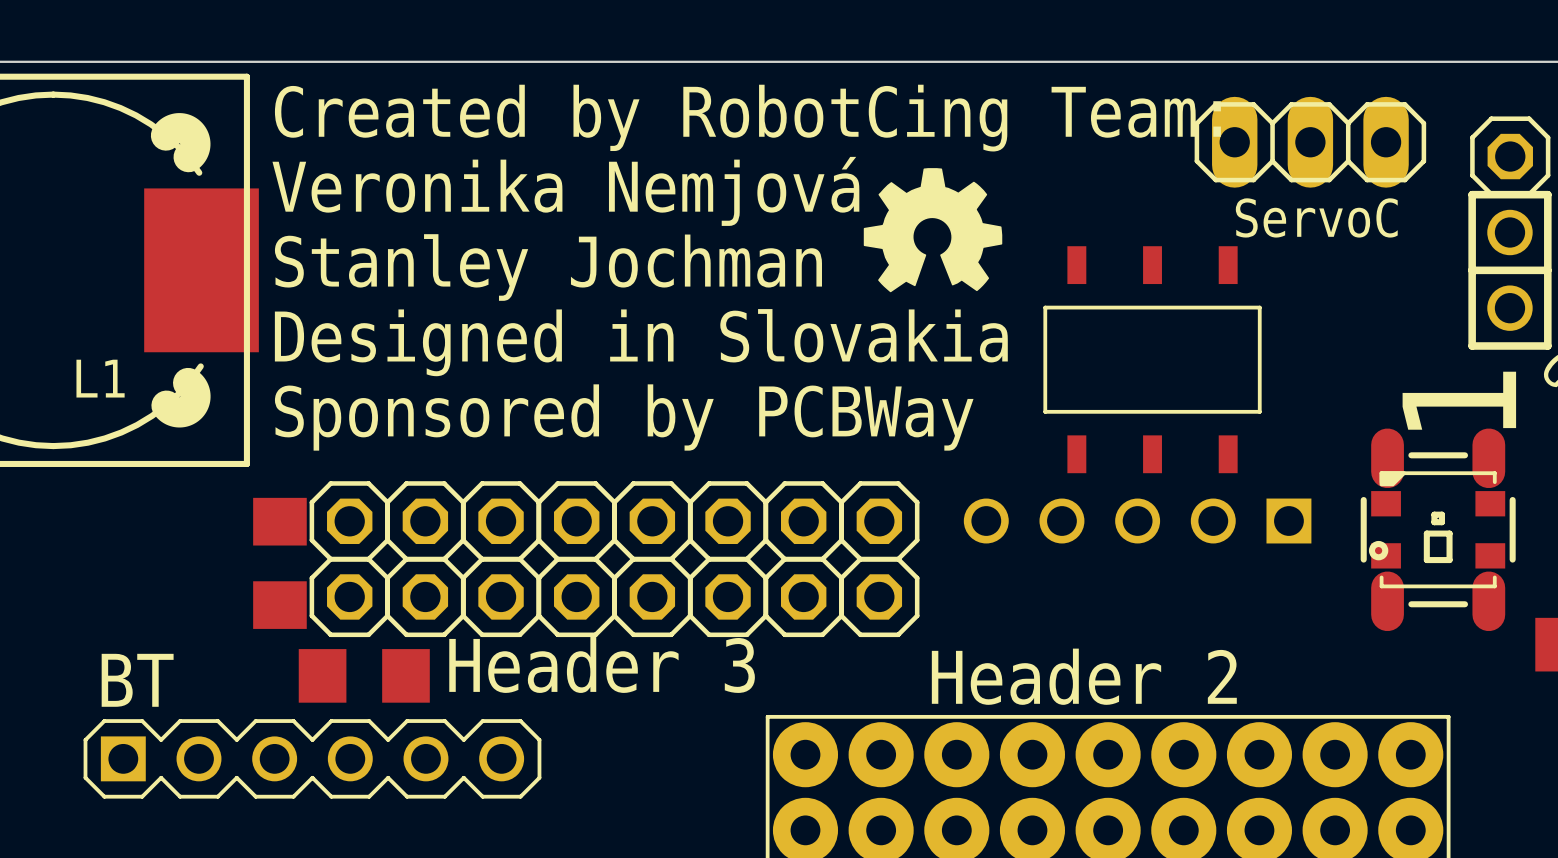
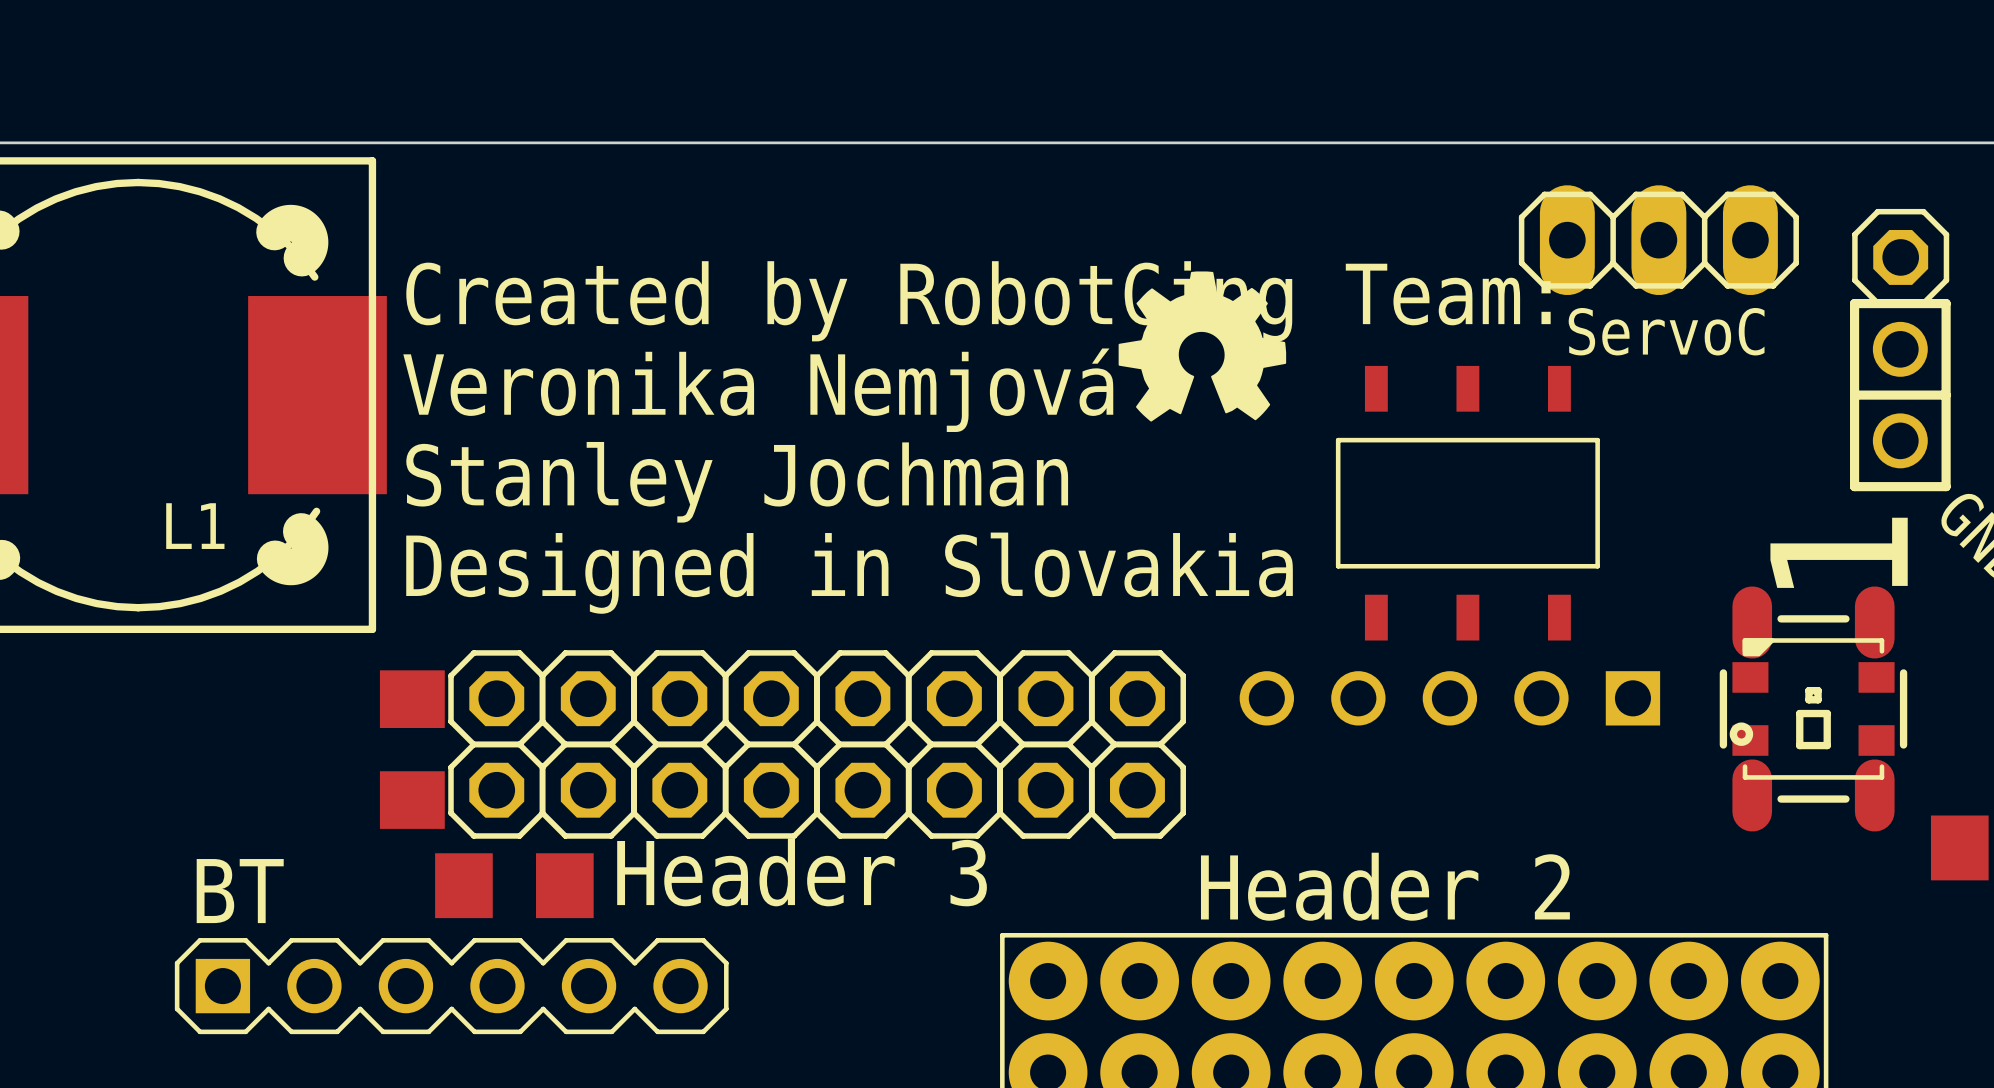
text: Created by RobotCing Team: (747, 118) -> none
text: Veronika Nemjová (565, 191) -> Created by RobotCing Team: (978, 301)
text: Stanley Jochman (548, 267) -> Veronika Nemjová (758, 390)
text: Designed in Slovakia (641, 342) -> Stanley Jochman (737, 482)
text: Sponsored by PCBWay (624, 417) -> Designed in Slovakia (849, 573)

